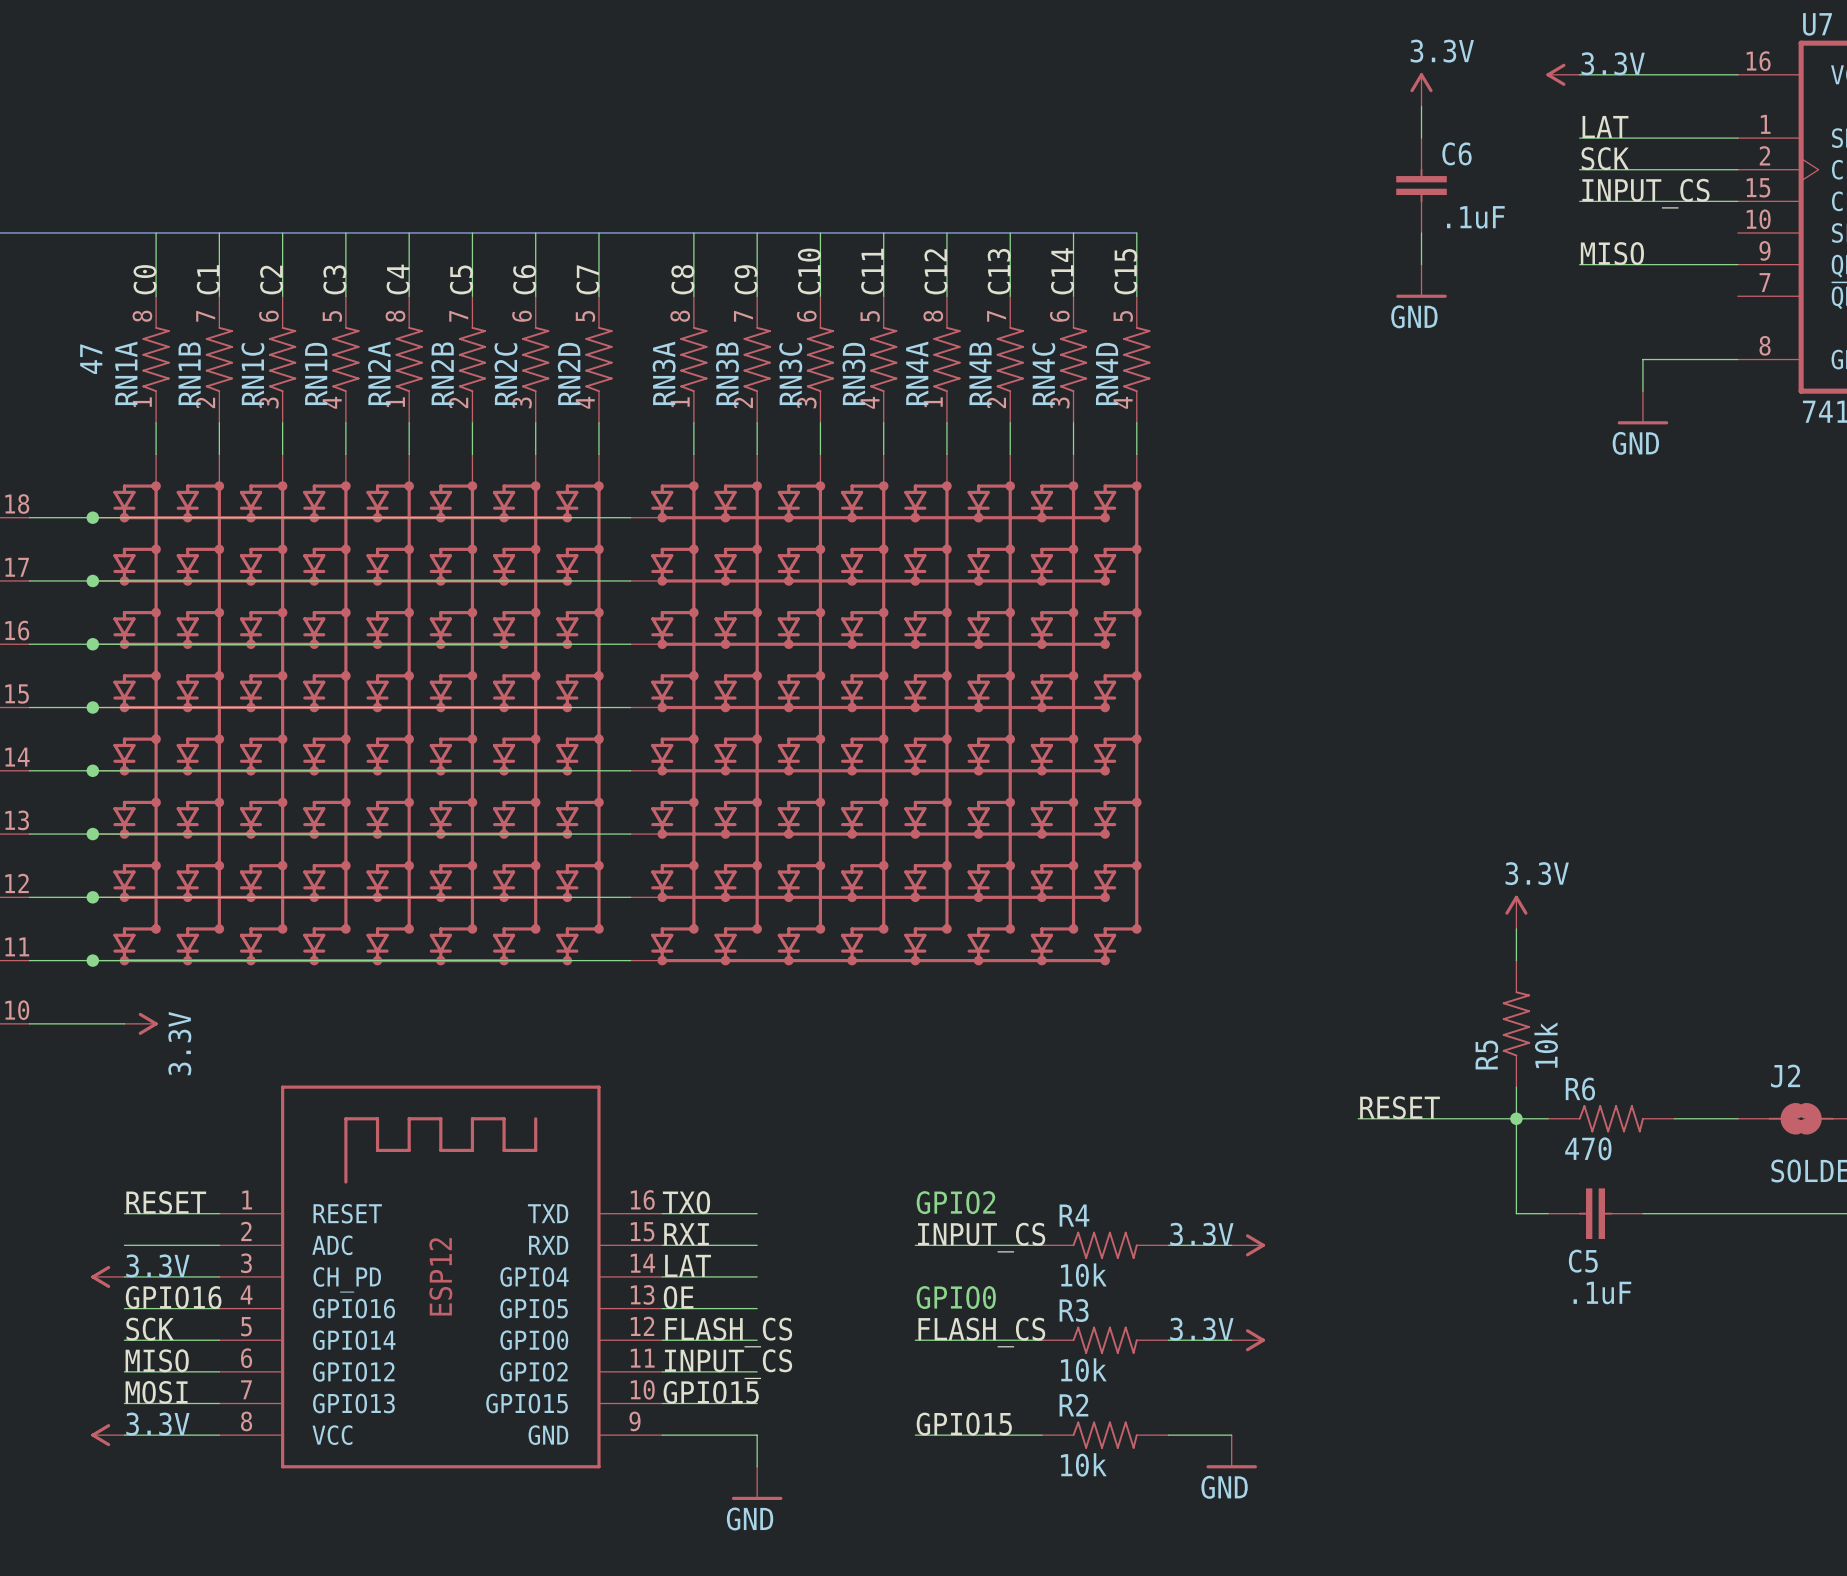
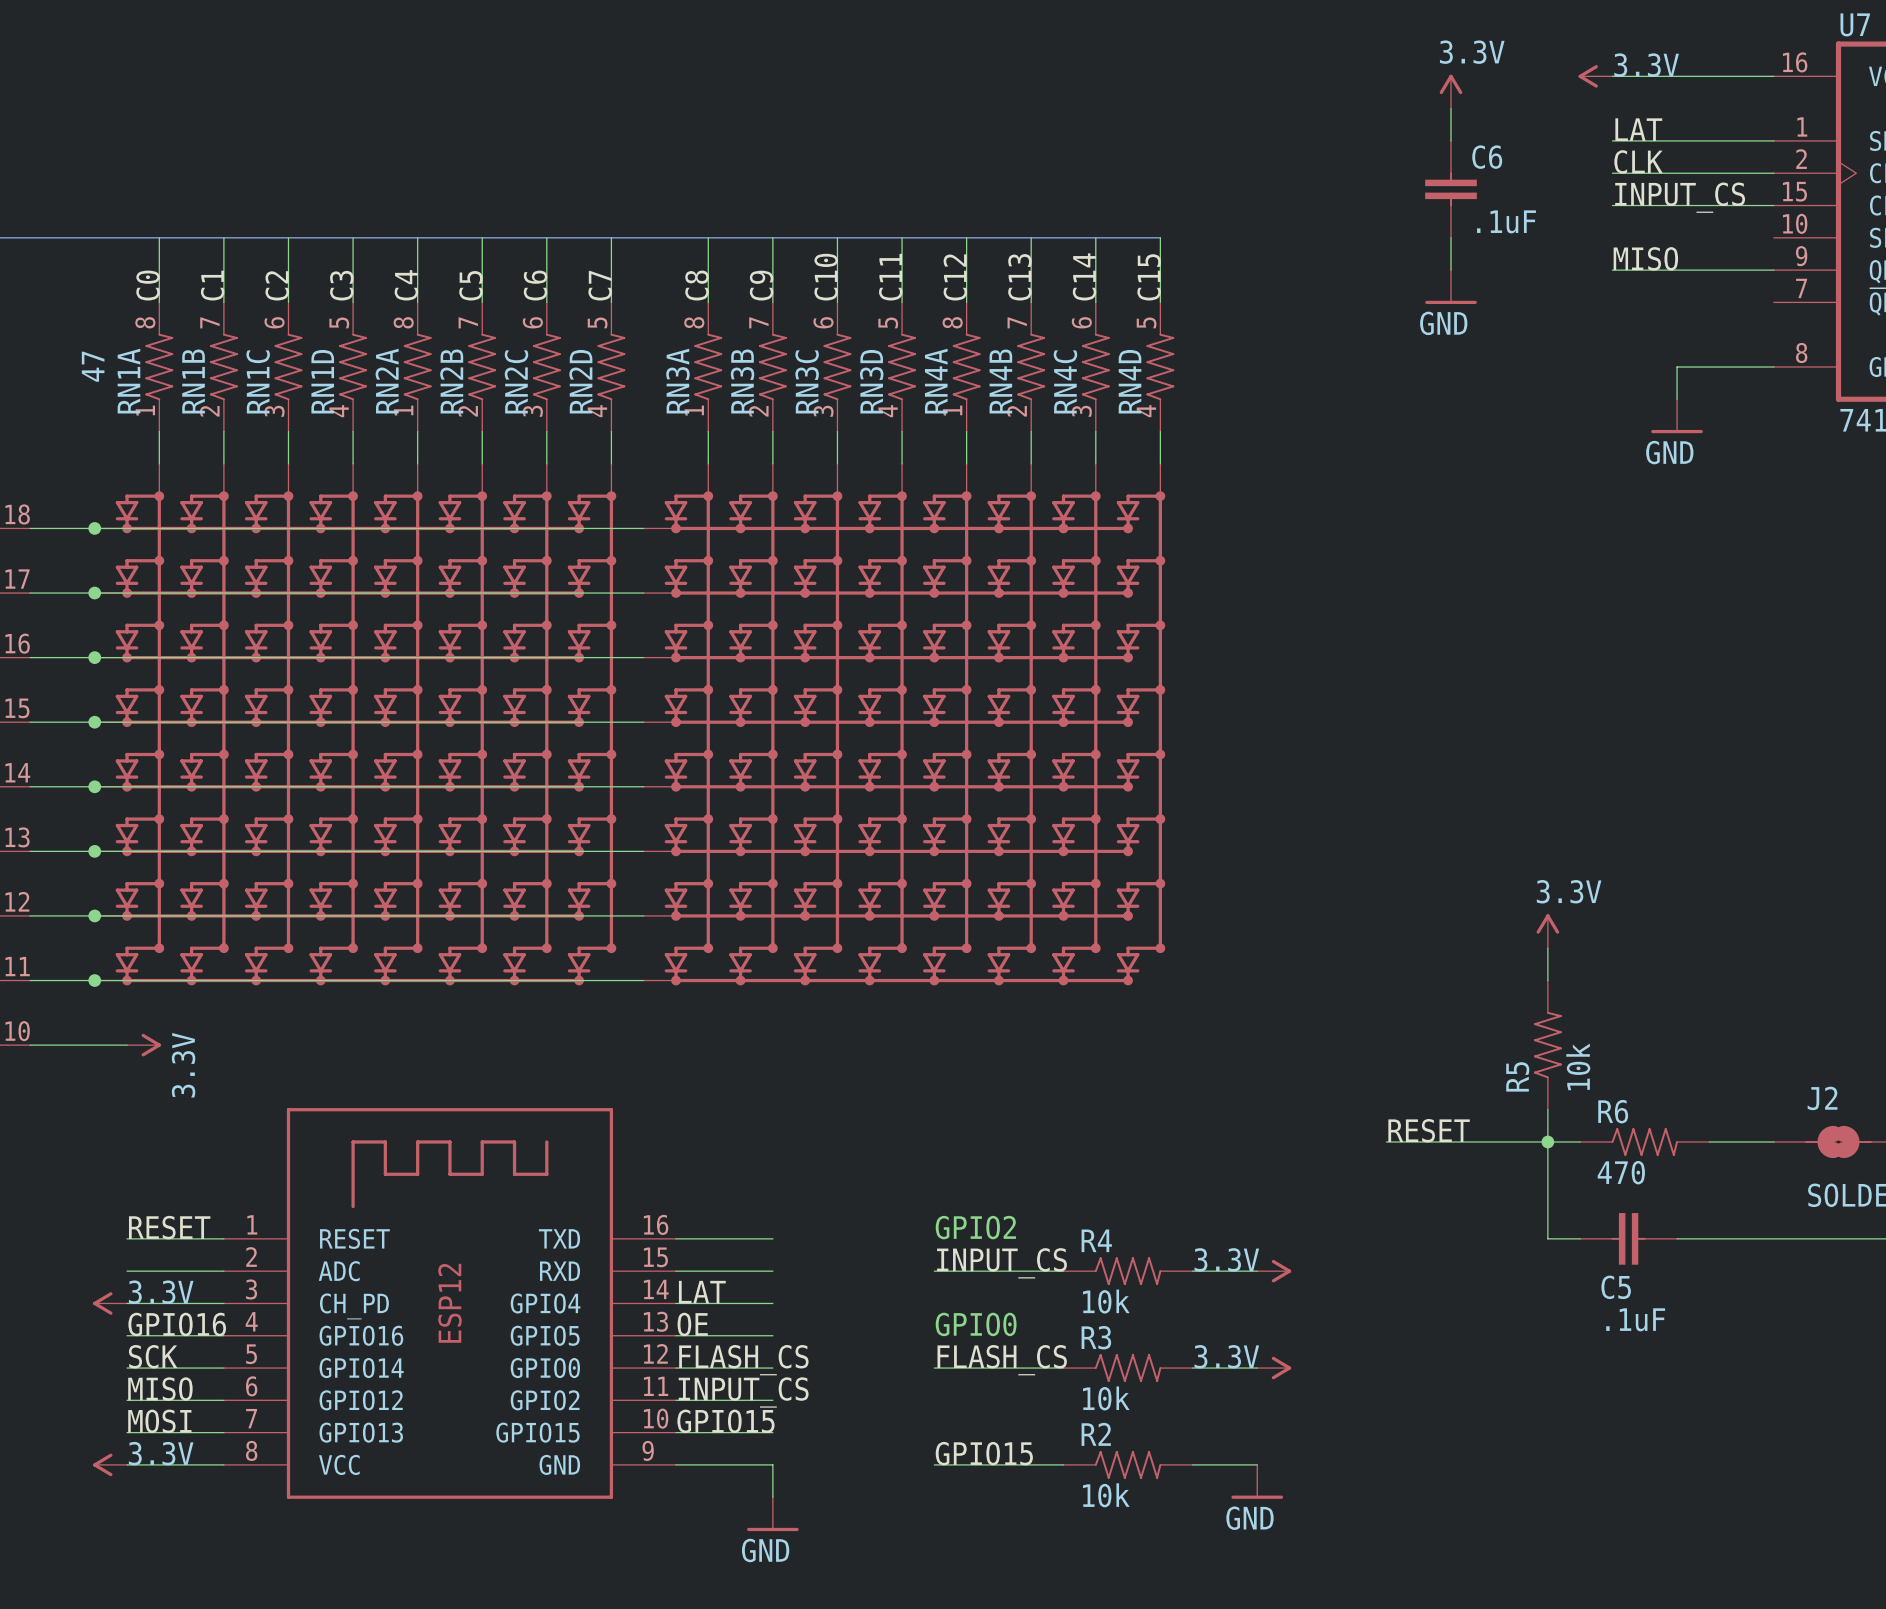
label: SCK (1605, 158) -> CLK (1638, 161)
label: TXO (686, 1202) -> none
label: RXI (686, 1234) -> none

